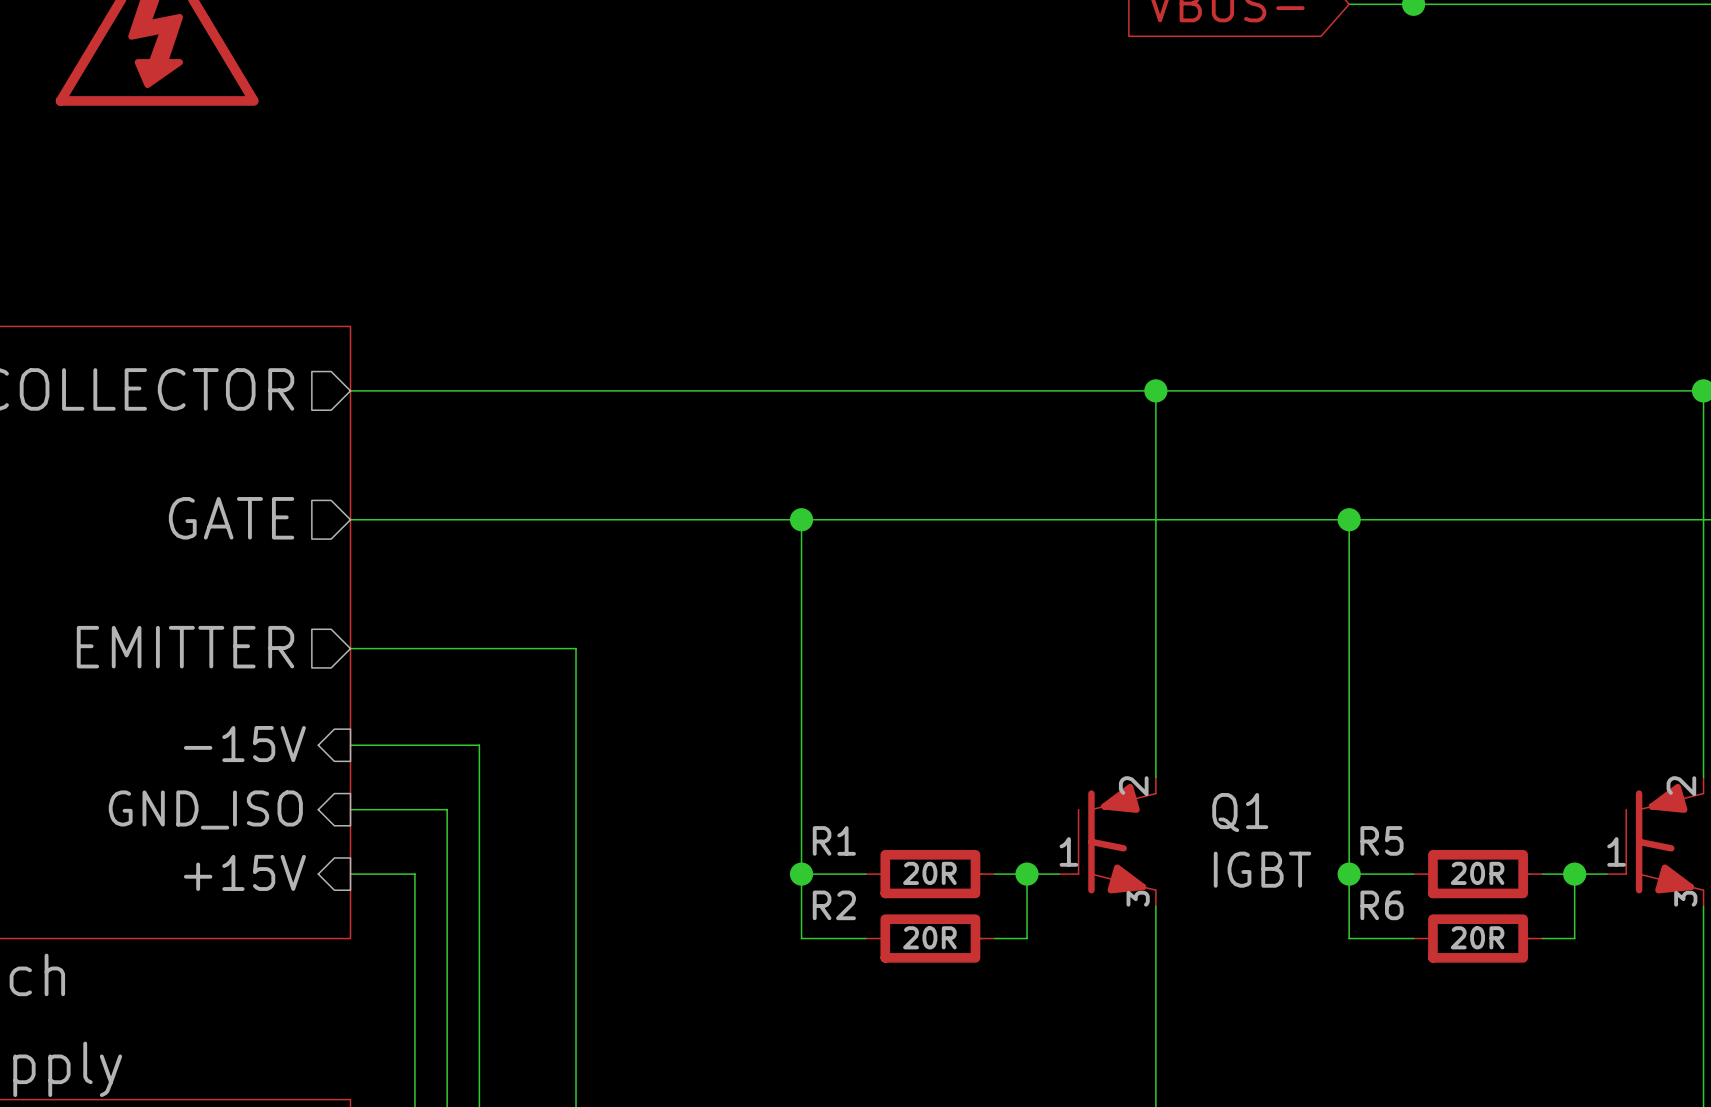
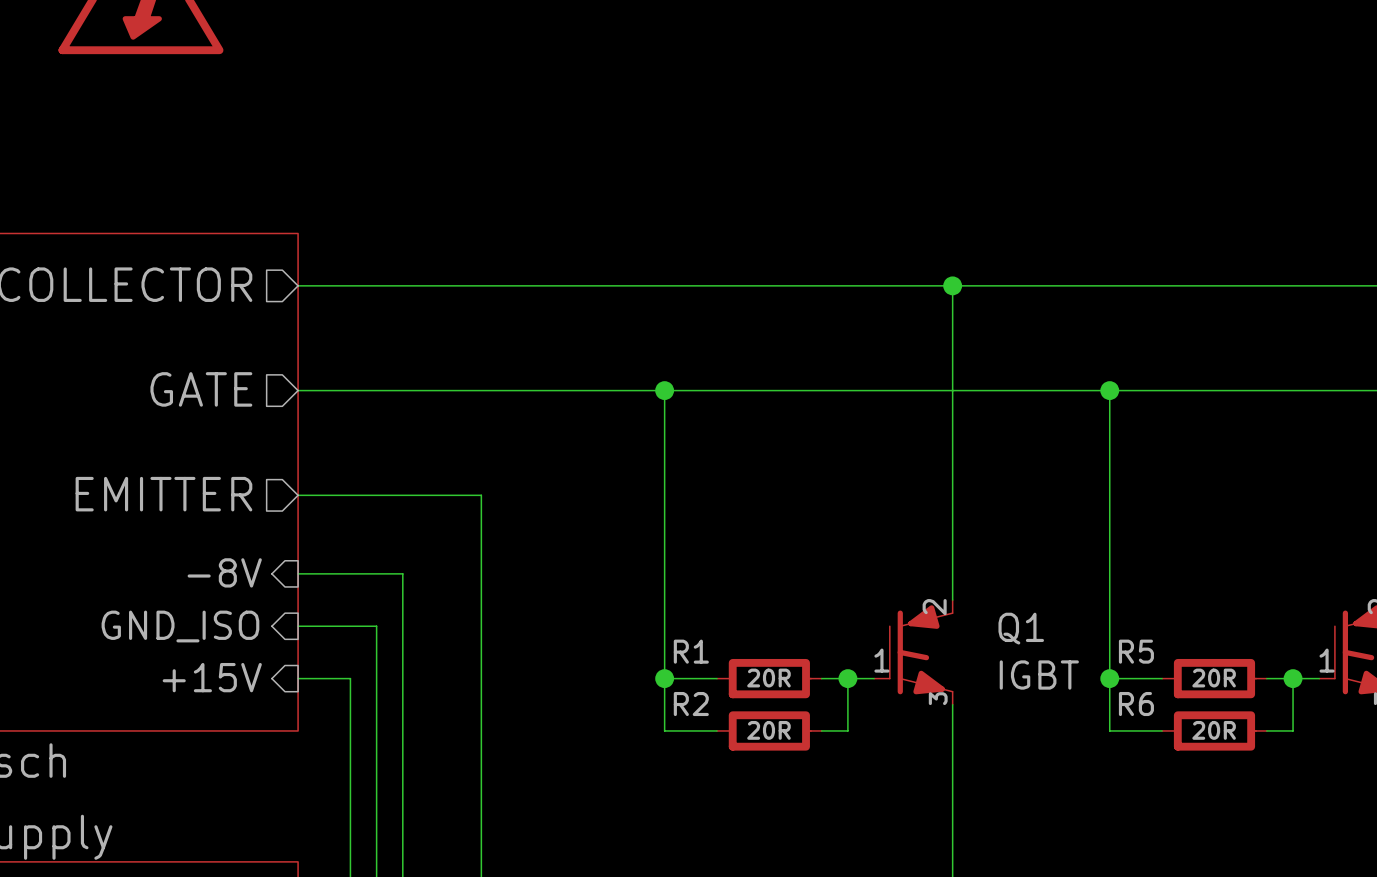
sheet pin: -15V (244, 744) -> -8V (224, 572)

